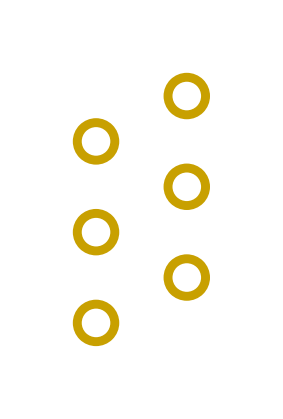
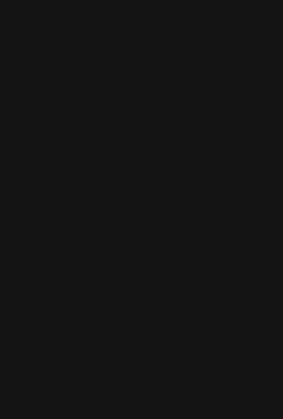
part: (141, 209) -> none

